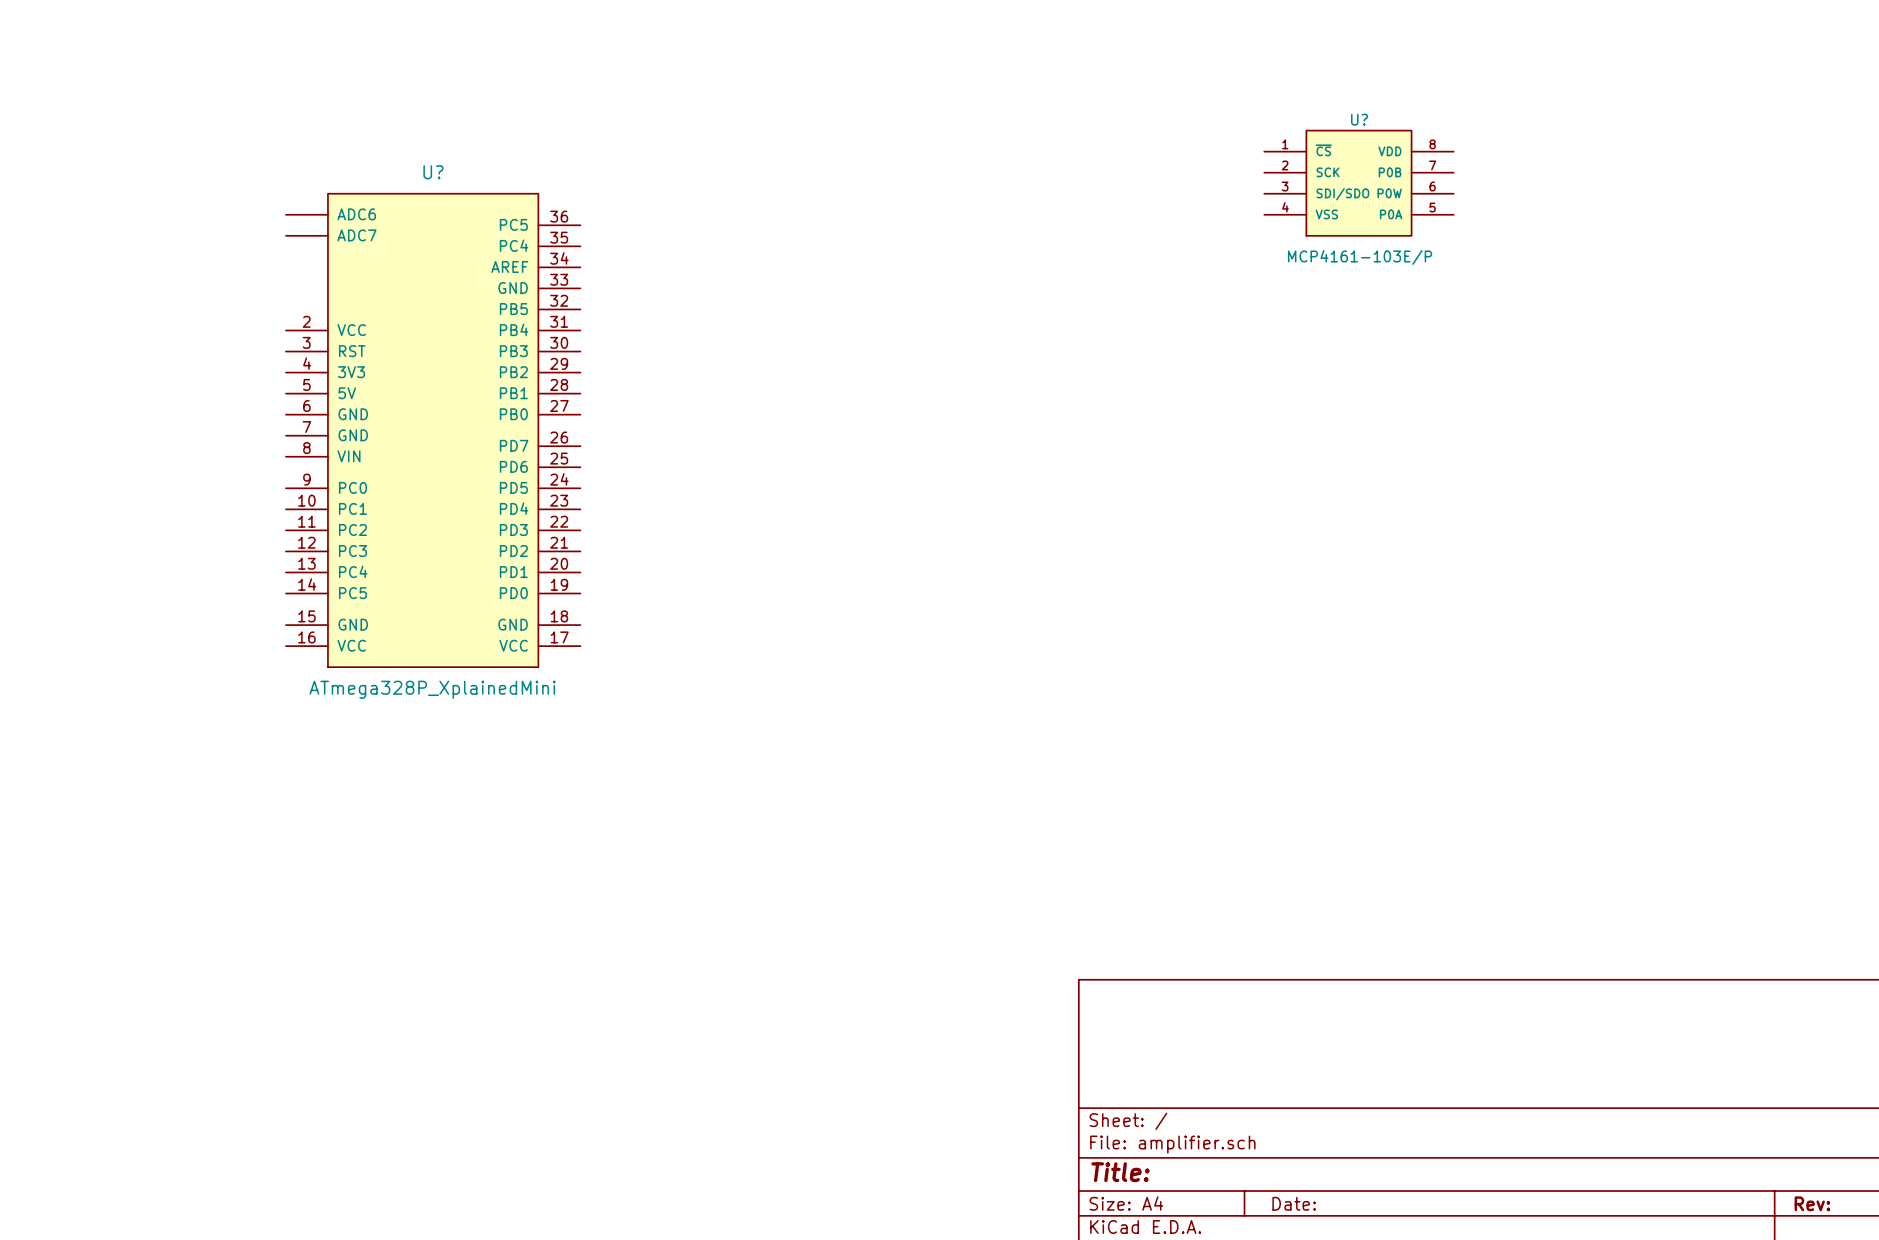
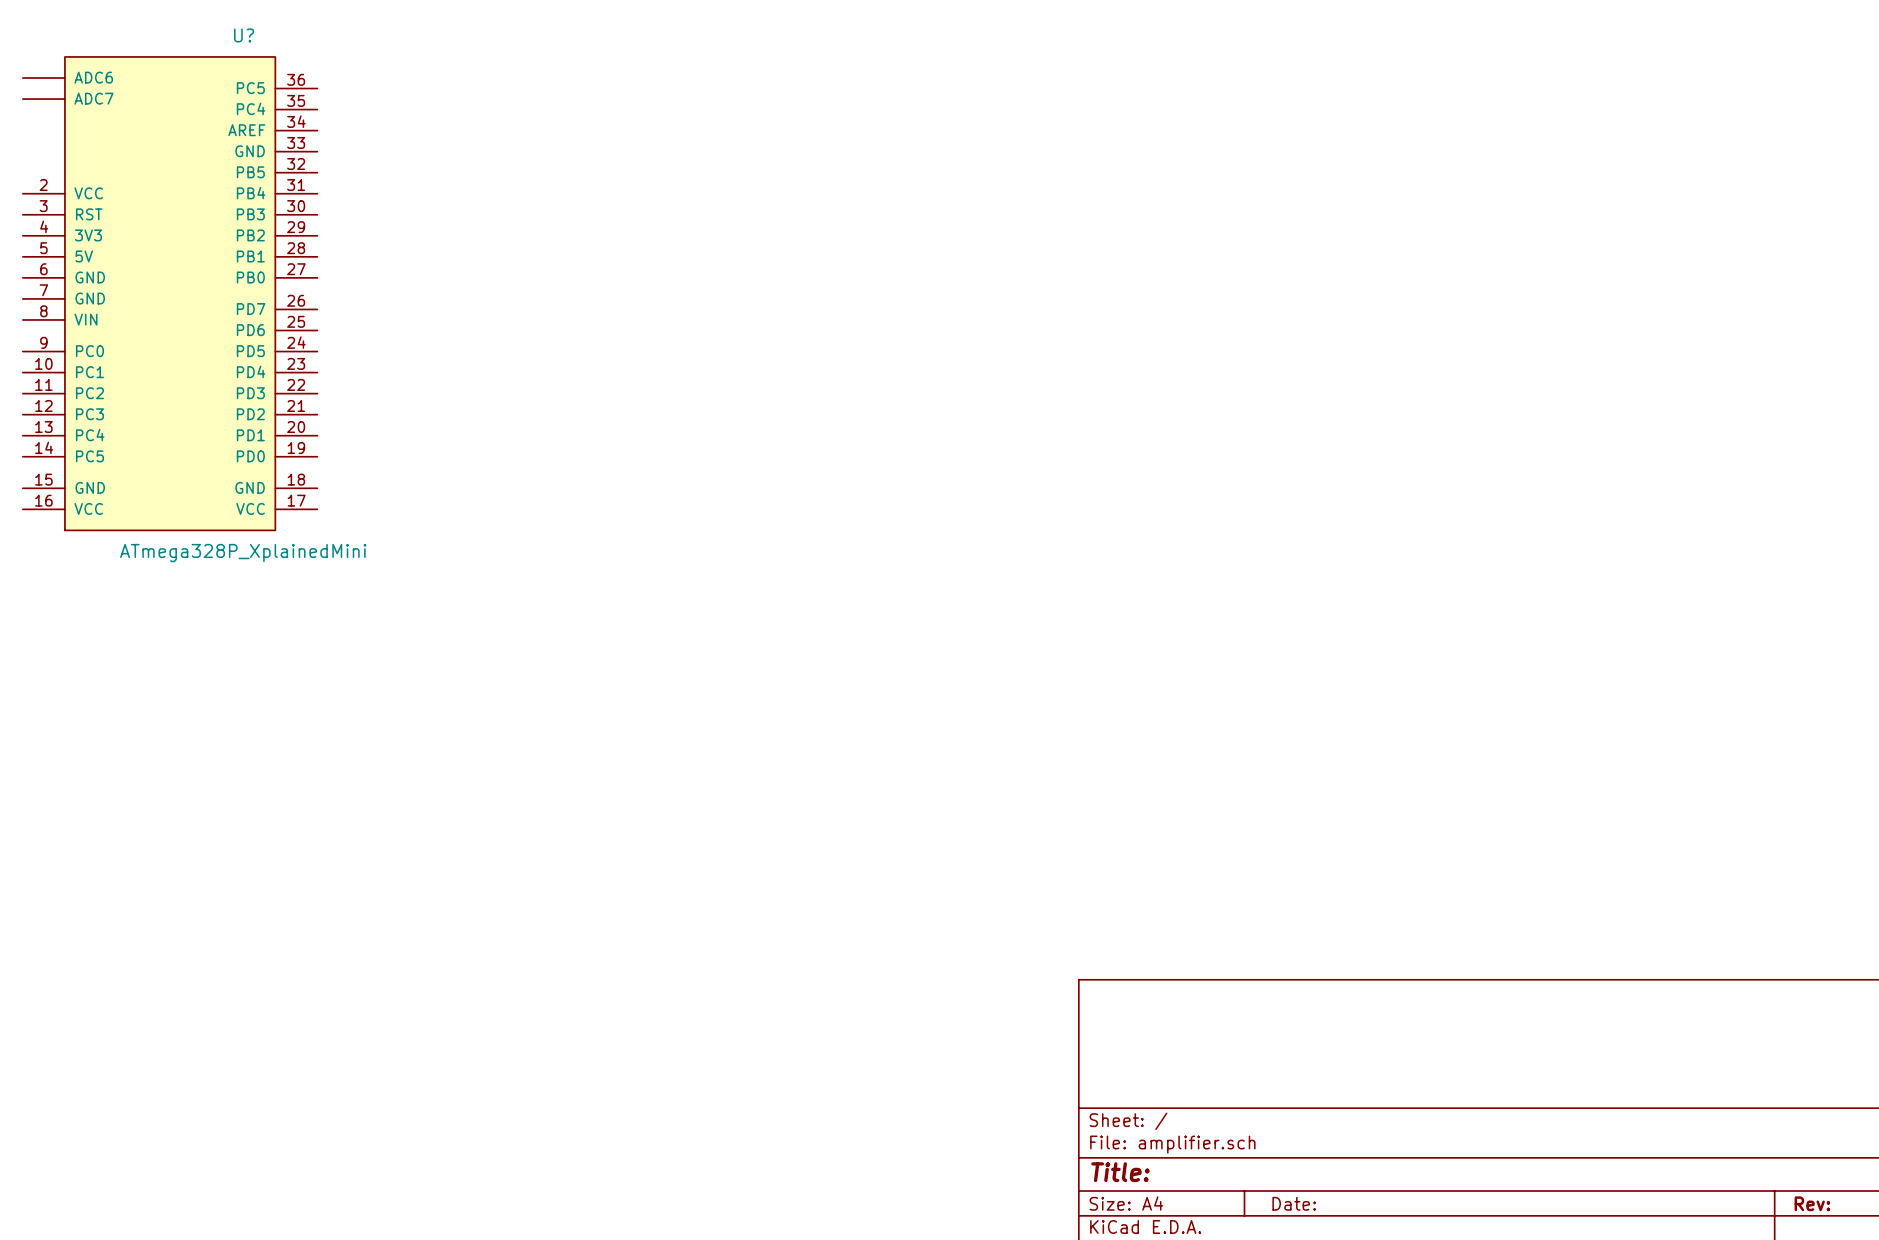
U?: MCP4161-103E/P (1358, 183) -> none
U?: none -> ATmega328P_XplainedMini (170, 293)
U?: ATmega328P_XplainedMini (433, 430) -> none

